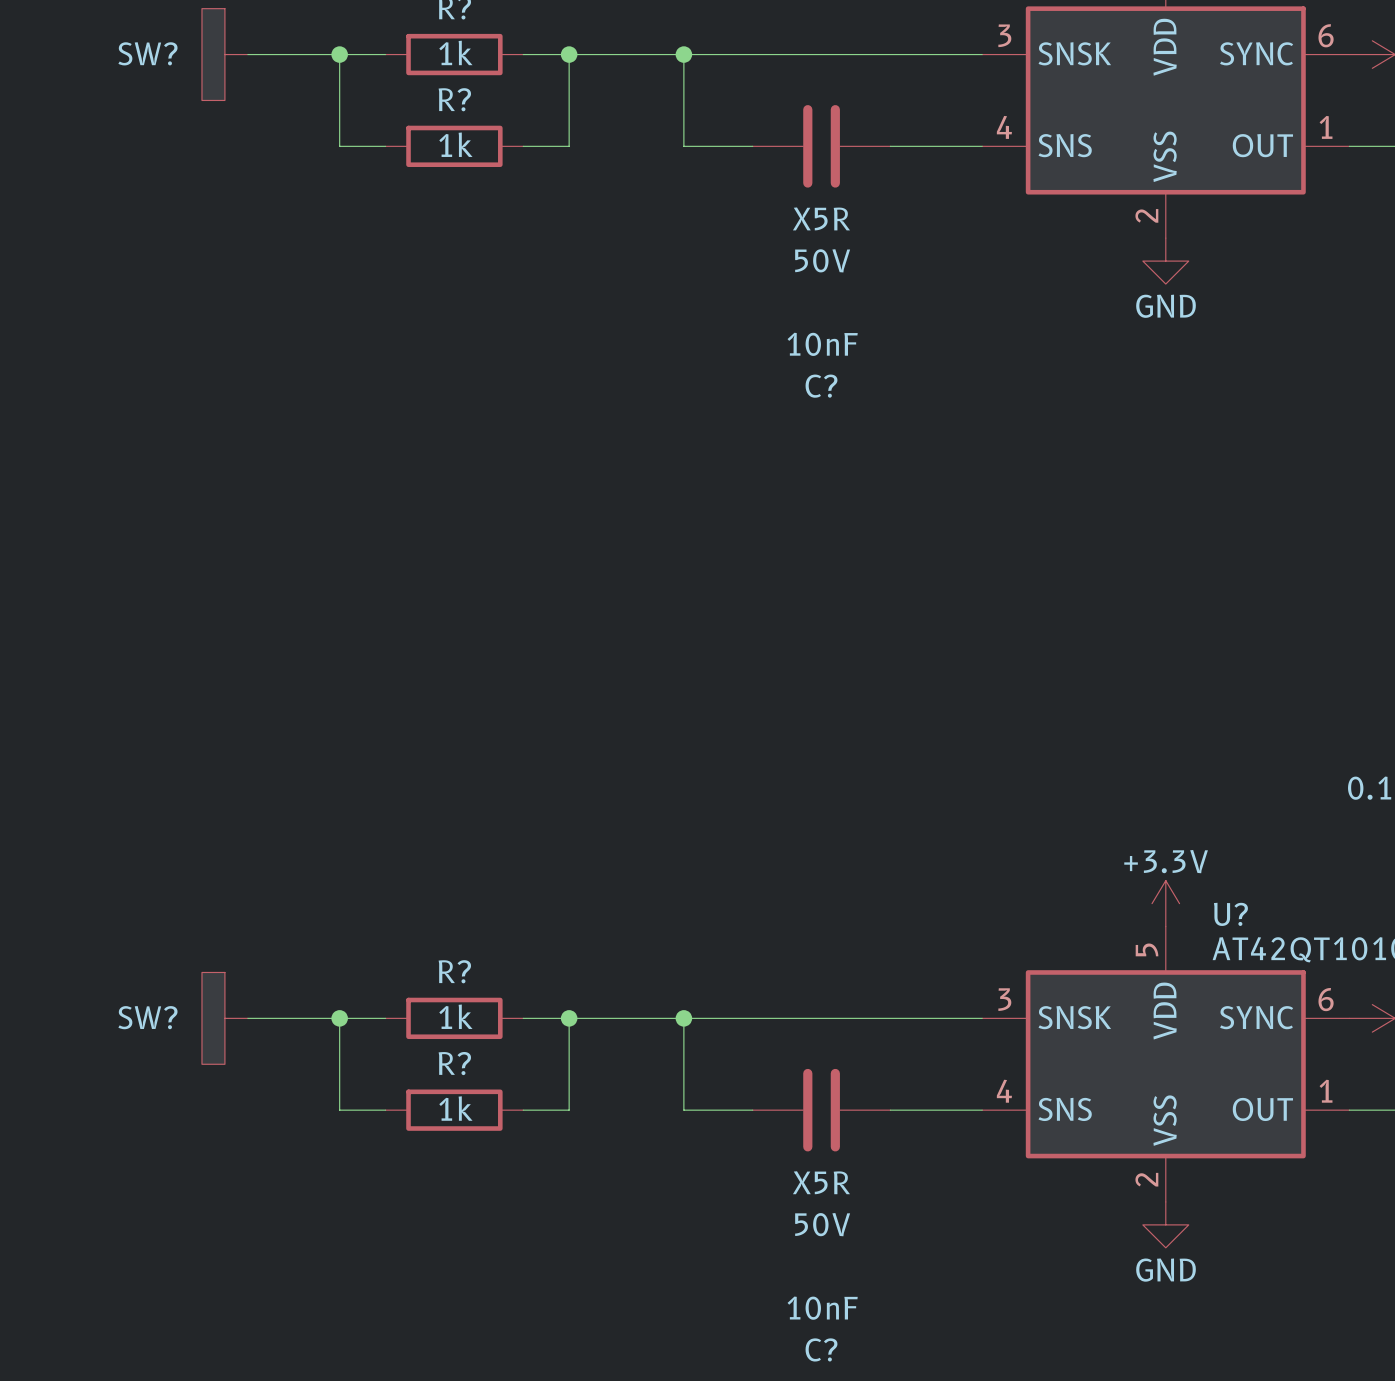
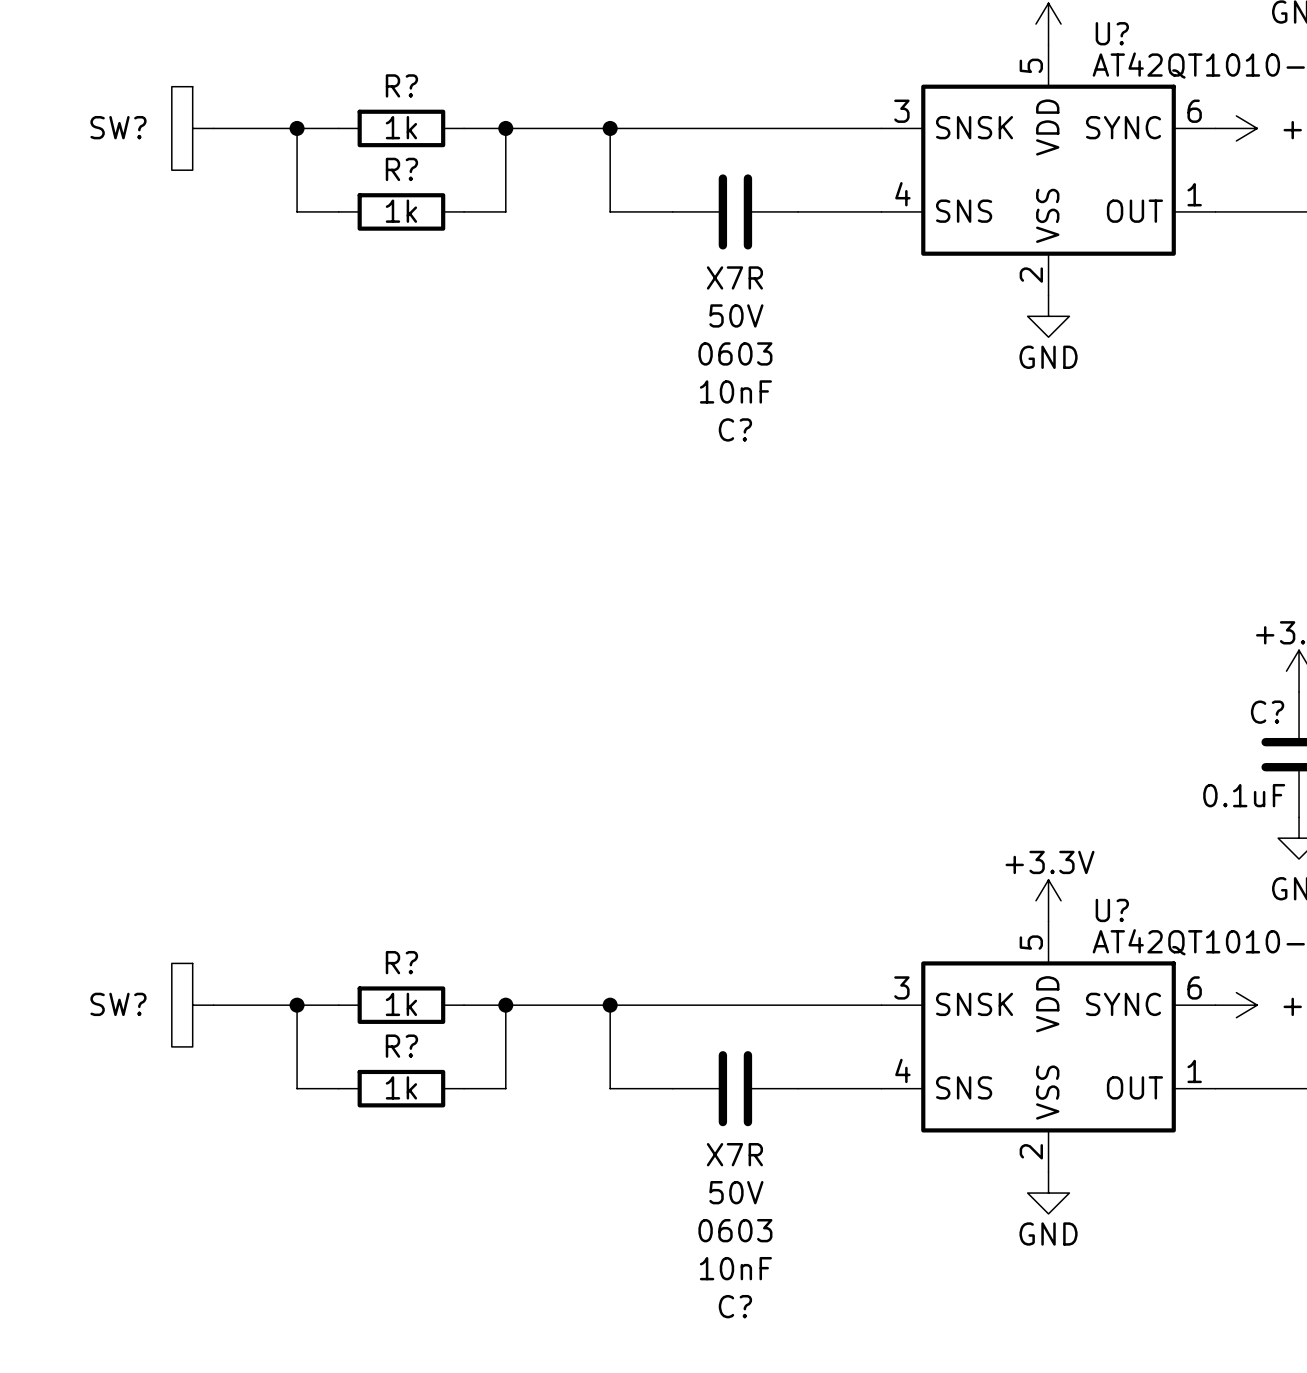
C? text: X5R (821, 218) -> X7R (734, 277)
C? text: none -> 0603 (735, 353)
C? text: X5R (821, 1182) -> X7R (734, 1154)
C? text: none -> 0603 (735, 1230)

